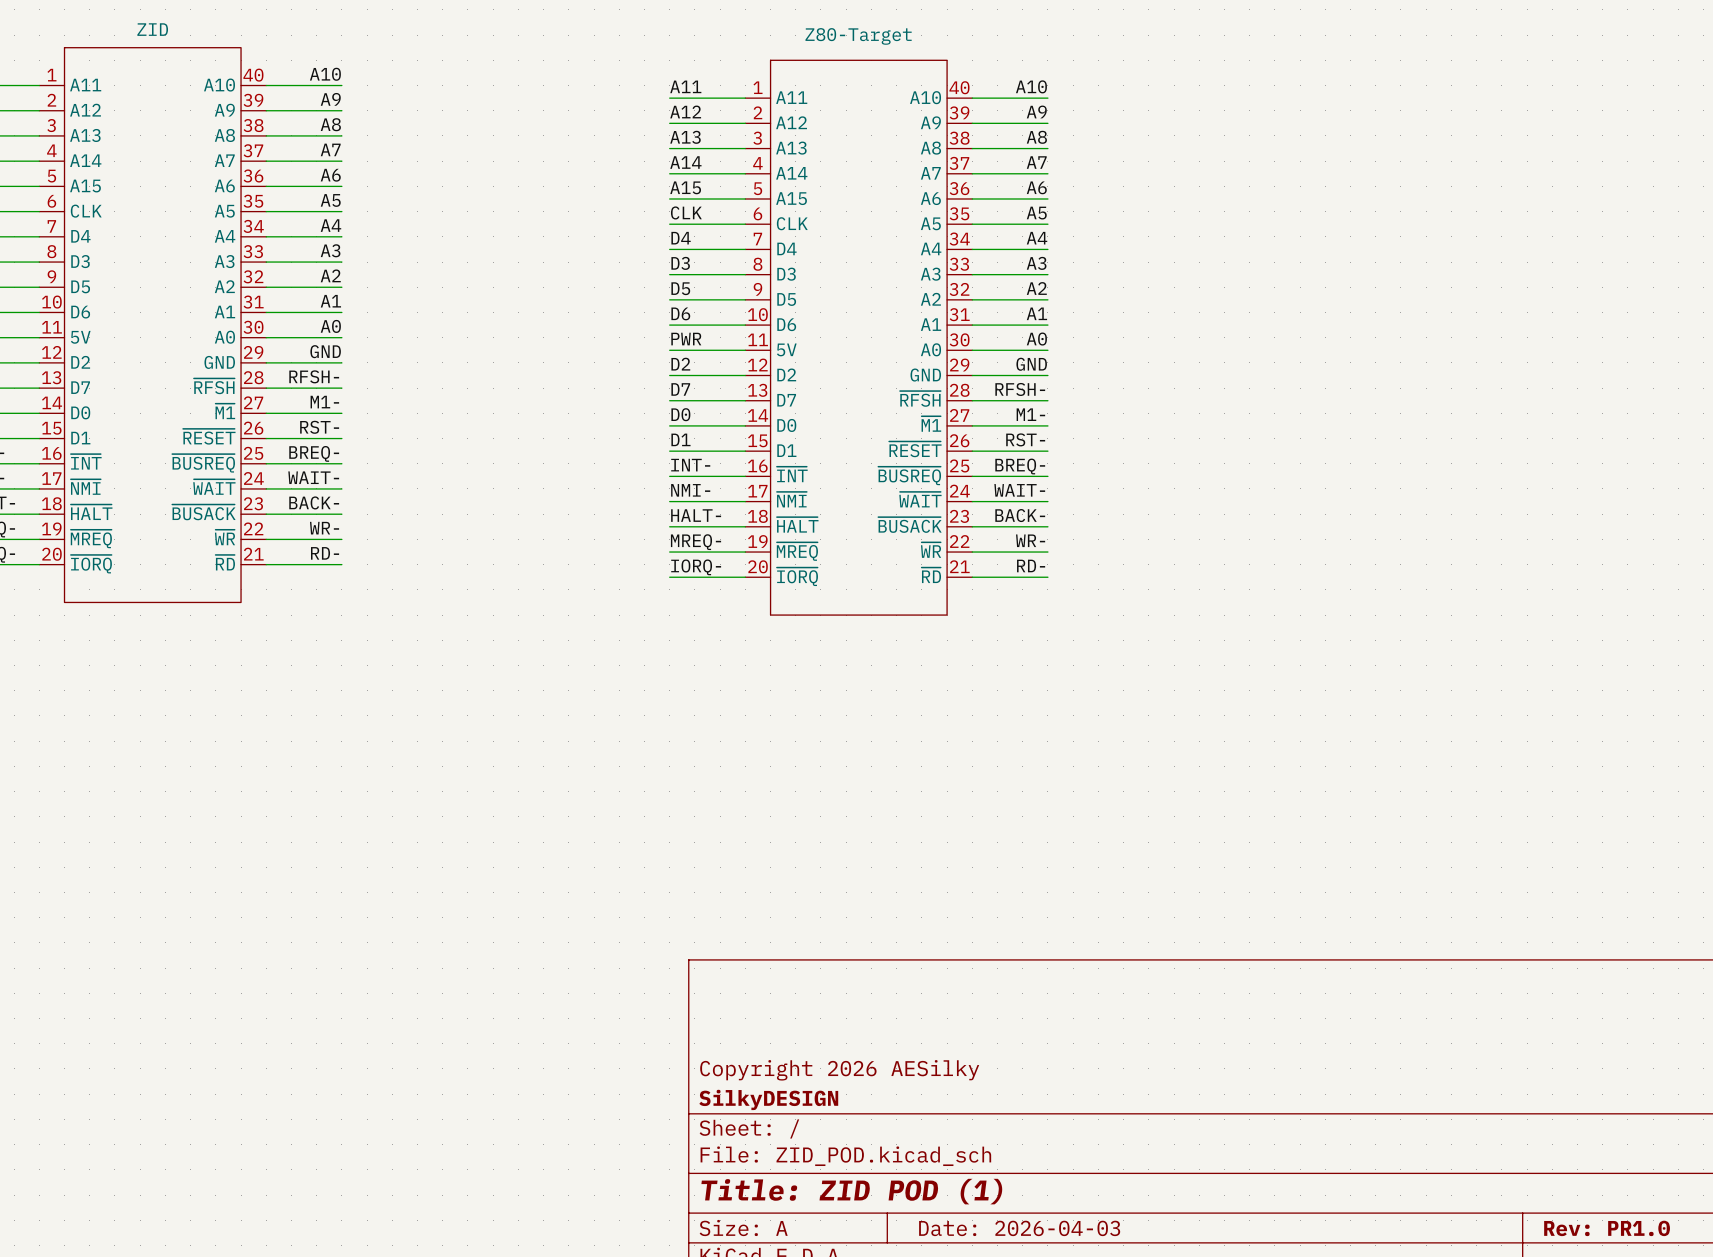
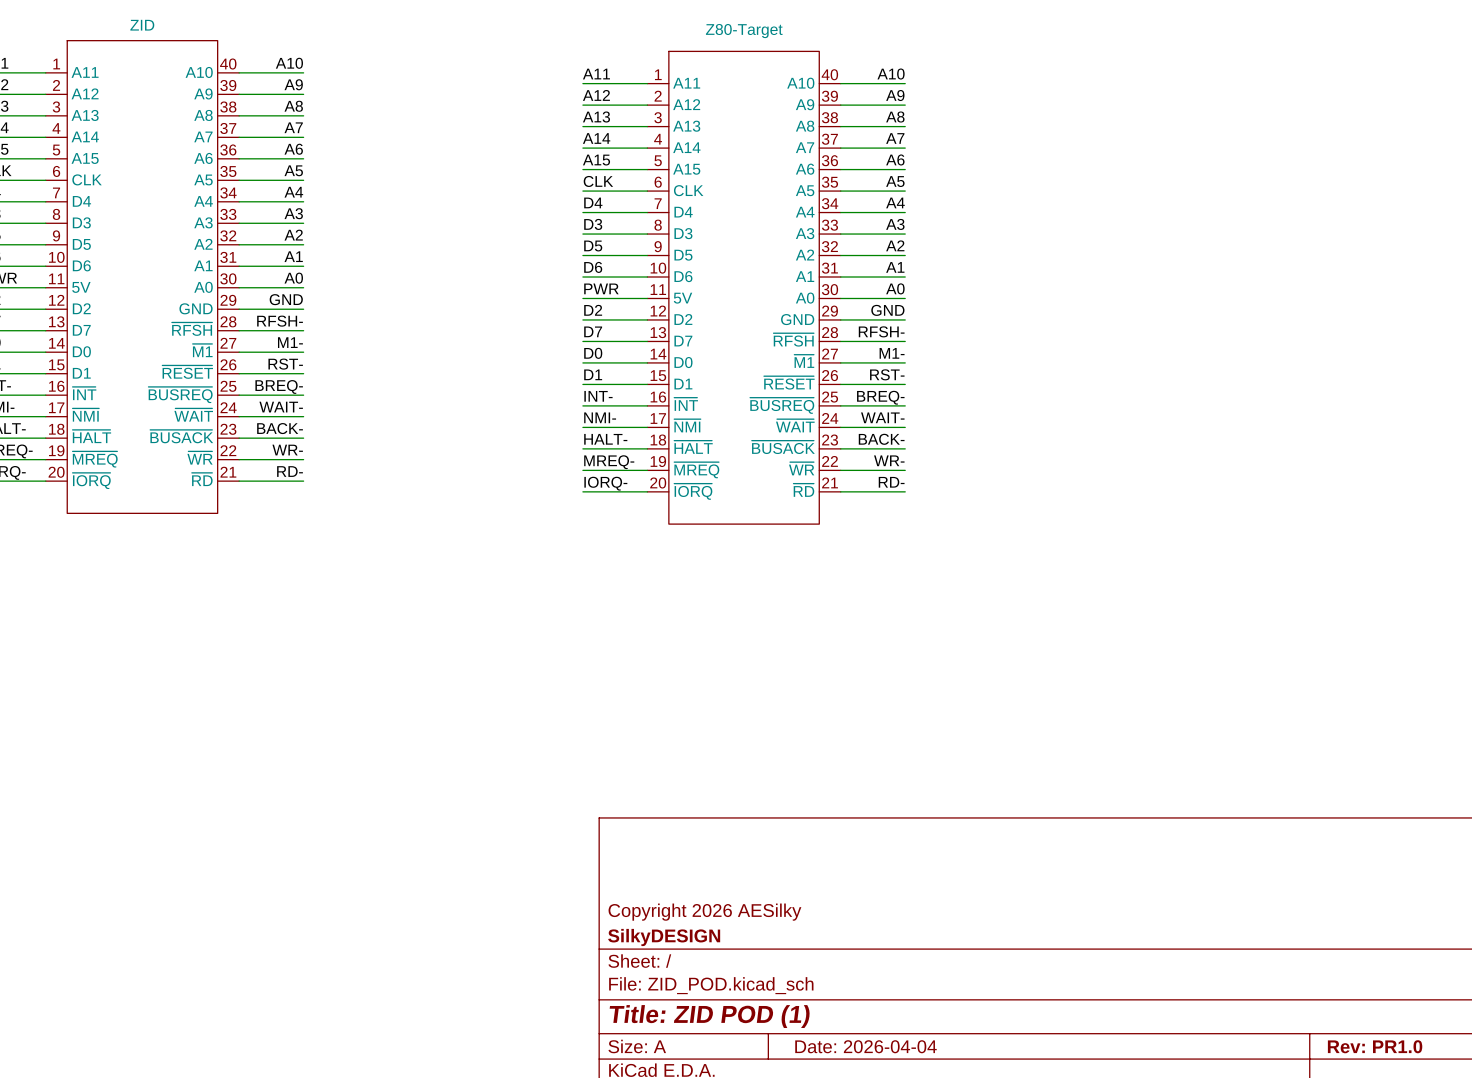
title block: Date: 2026-04-03 (1019, 1228) -> Date: 2026-04-04 (865, 1046)

